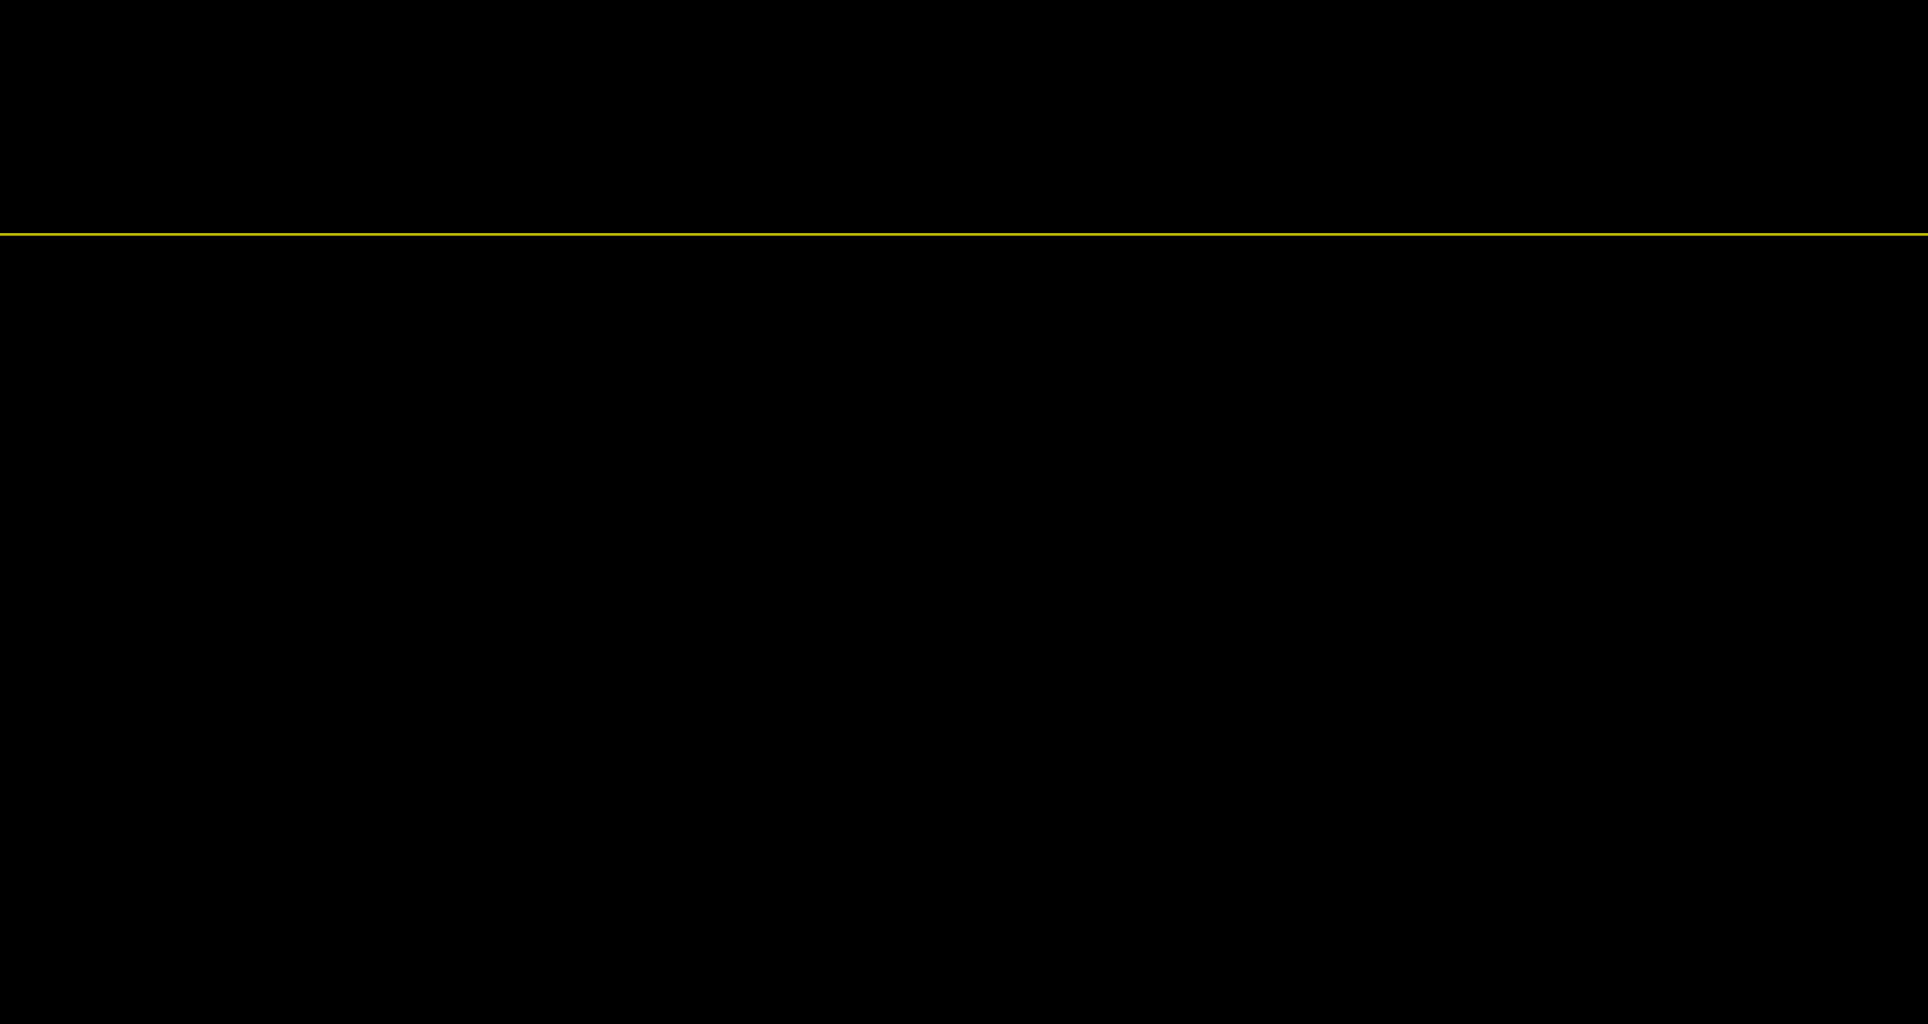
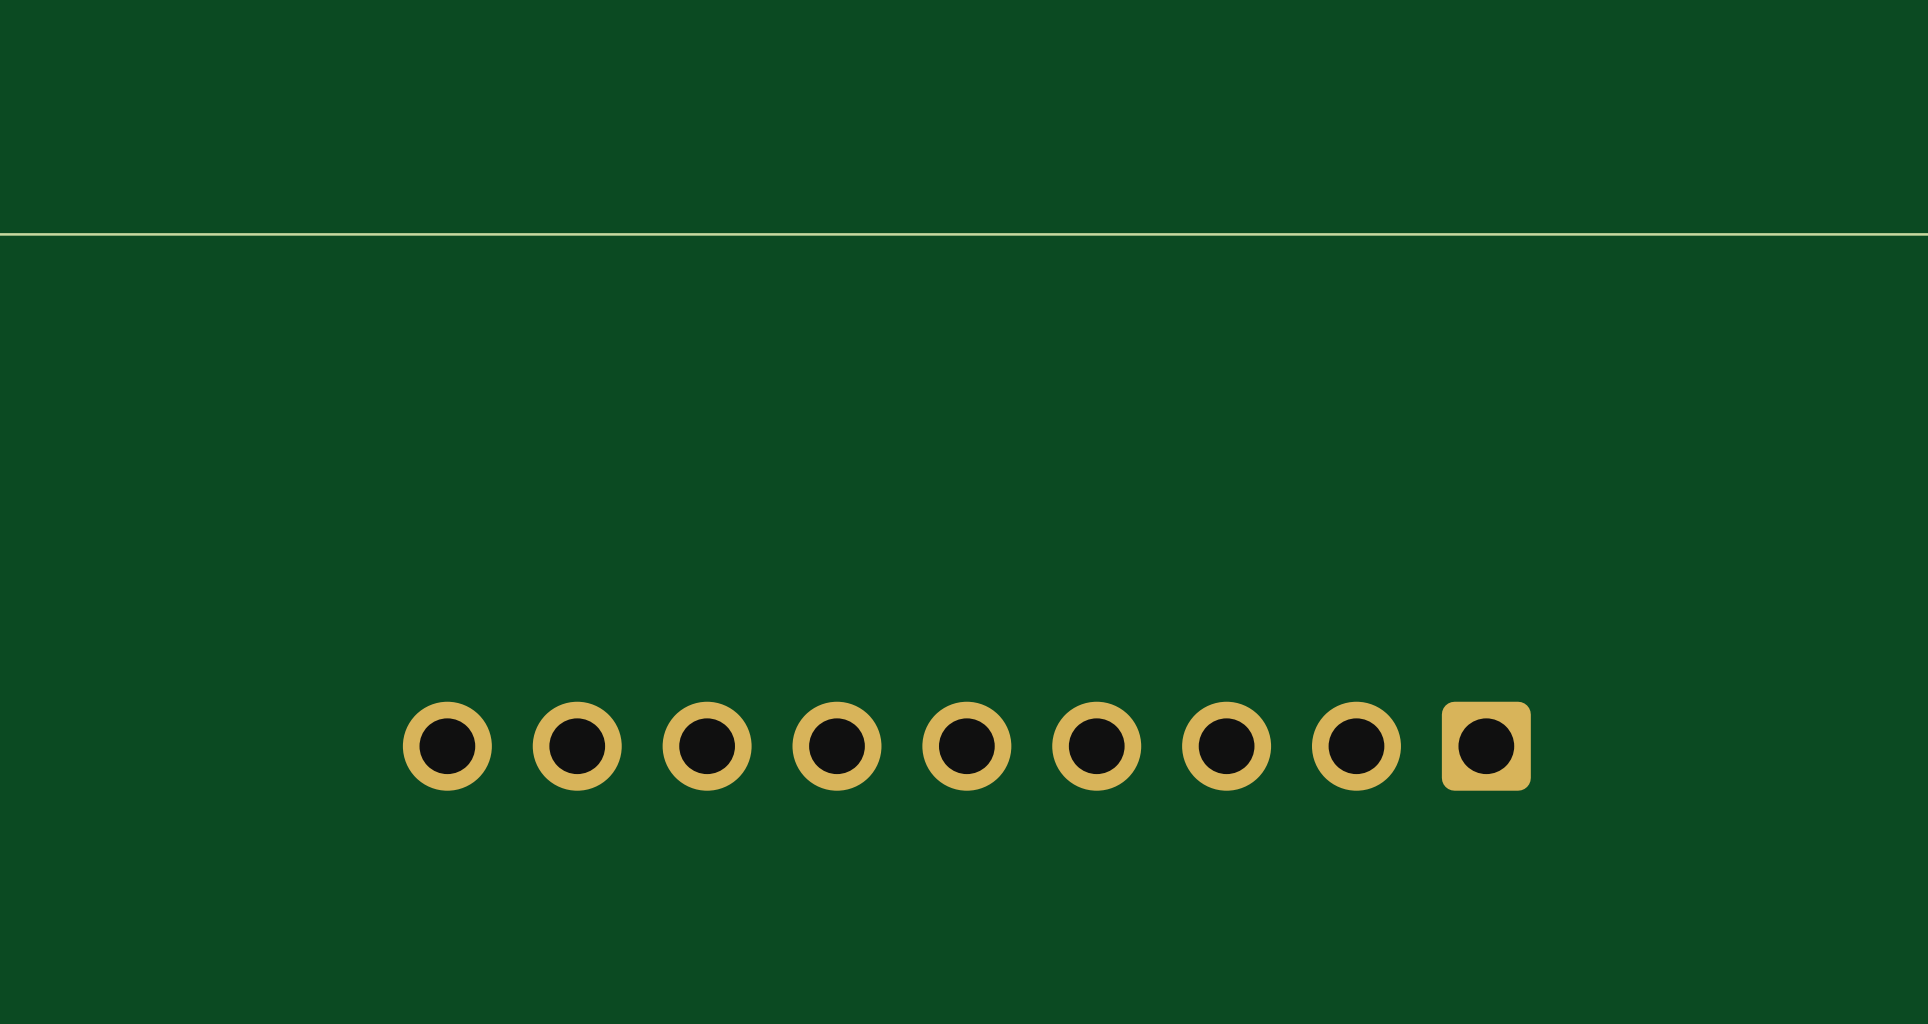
part: none -> (966, 746)

